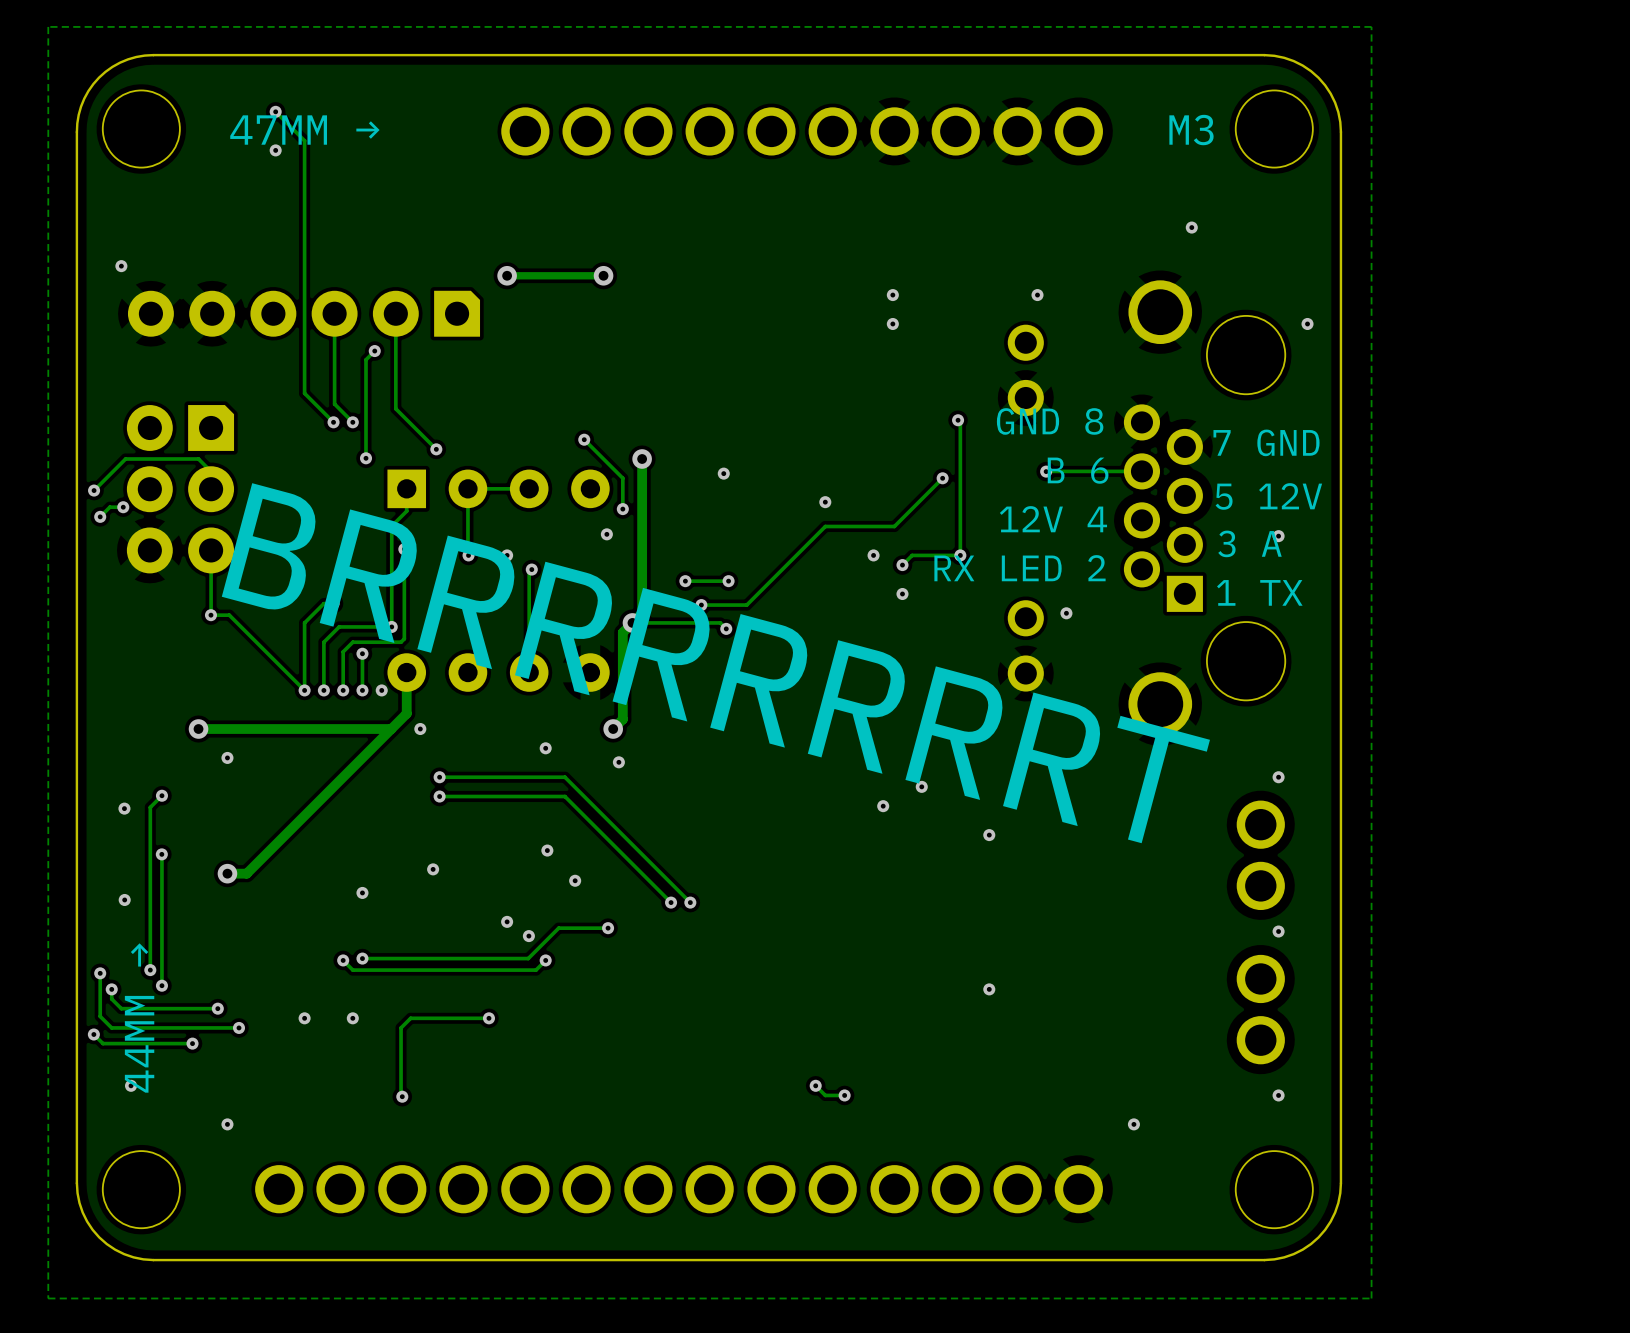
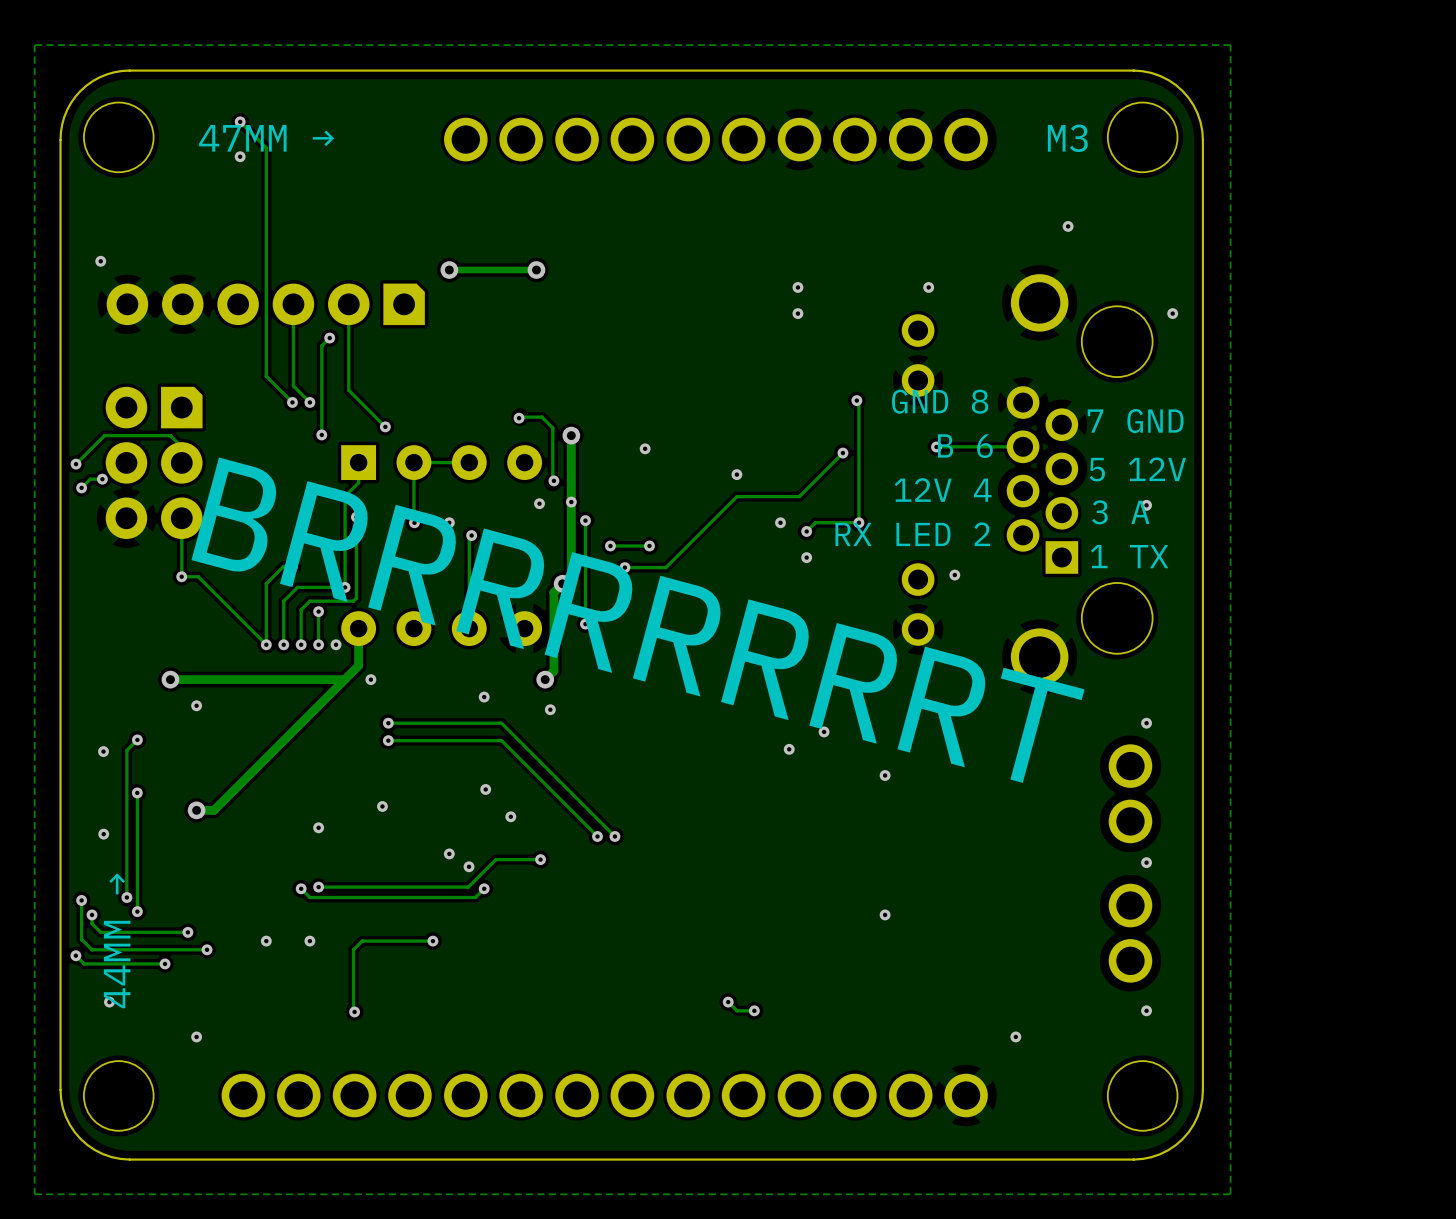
track: none -> (520, 417) (541, 417) (552, 428) (552, 482)
track: (584, 439) (622, 478) (622, 509) -> none
via: none -> (571, 502)
track: none -> (585, 520) (585, 624)
via: none -> (585, 520)
track: (632, 622) (720, 622) (726, 628) -> none
via: (726, 628) -> none
via: none -> (585, 624)

